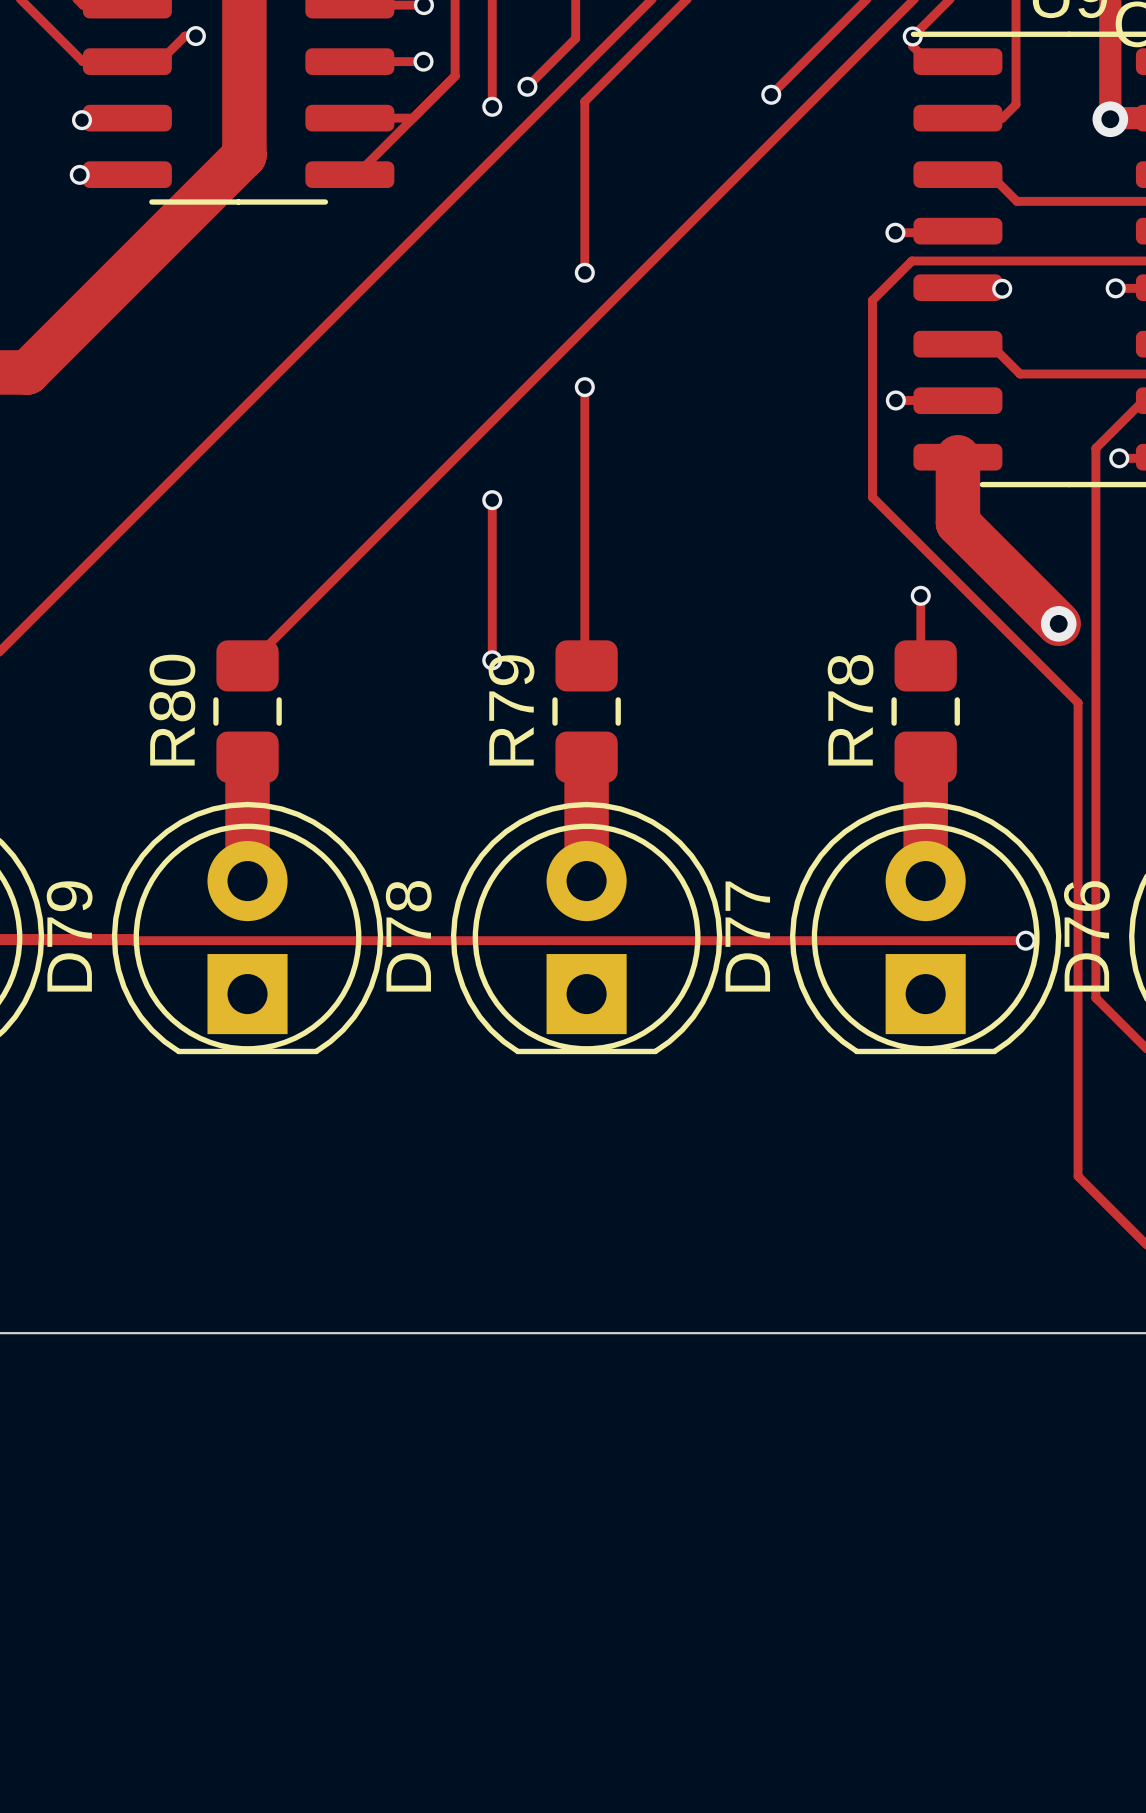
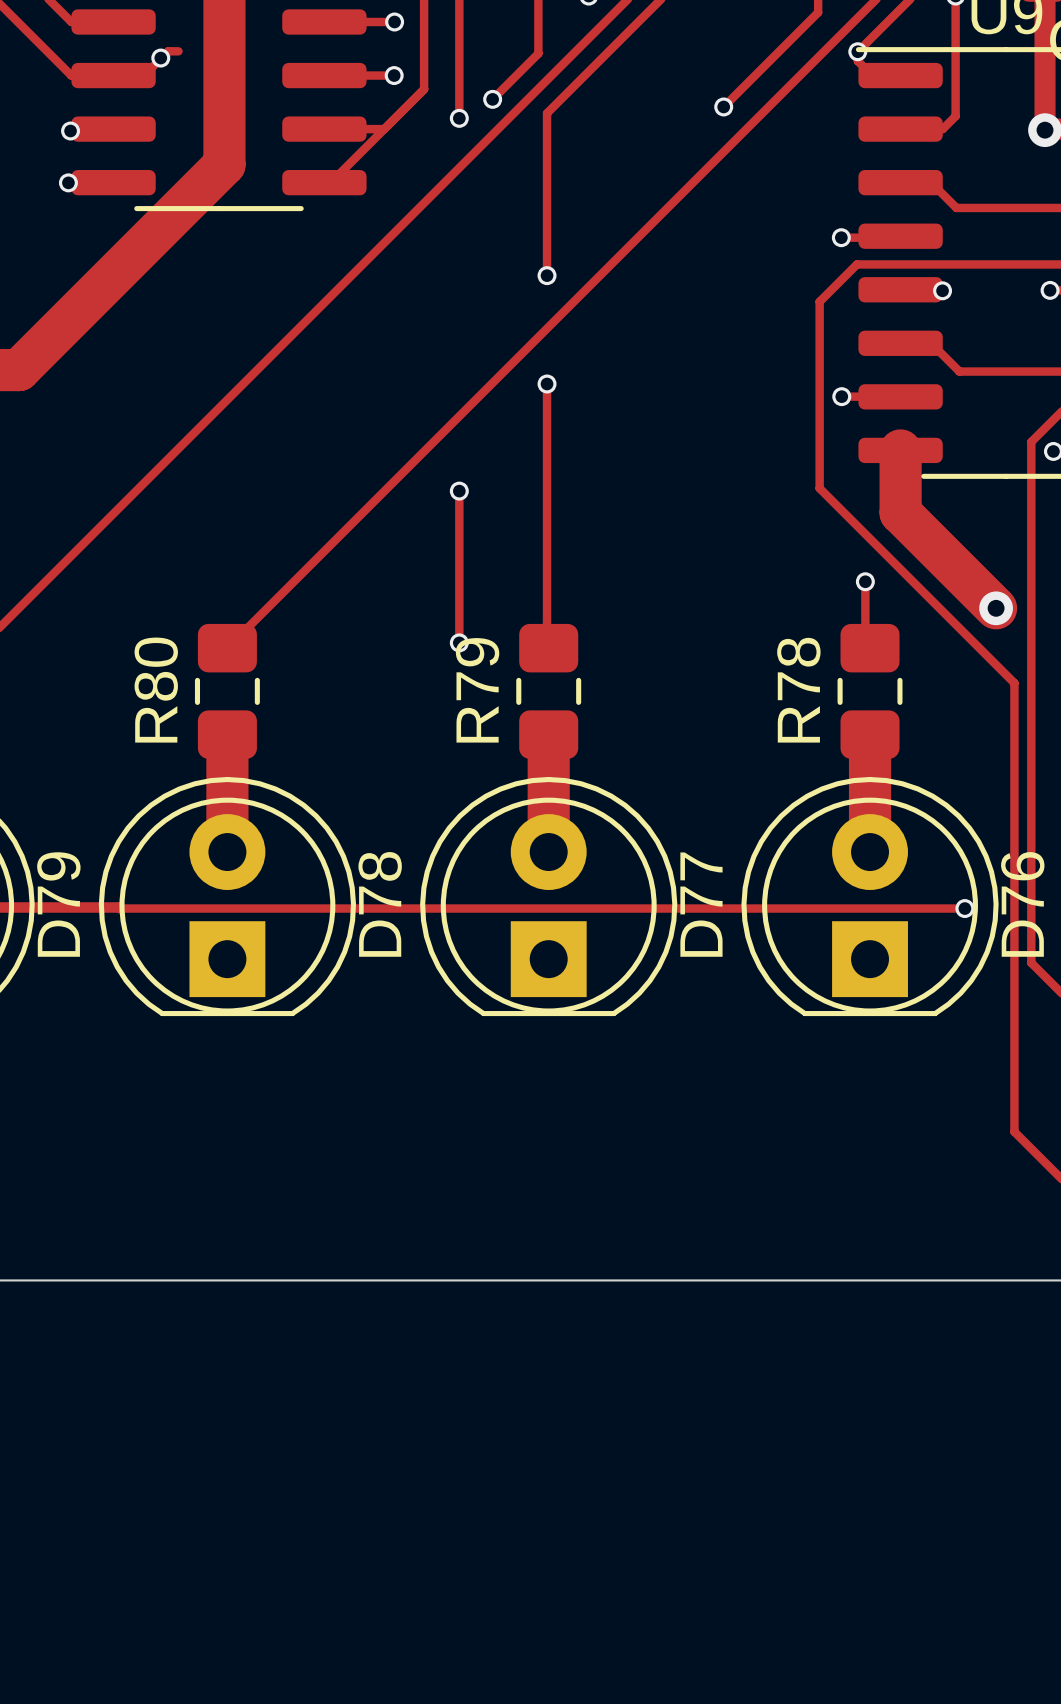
via position: (195, 36) -> (160, 58)

